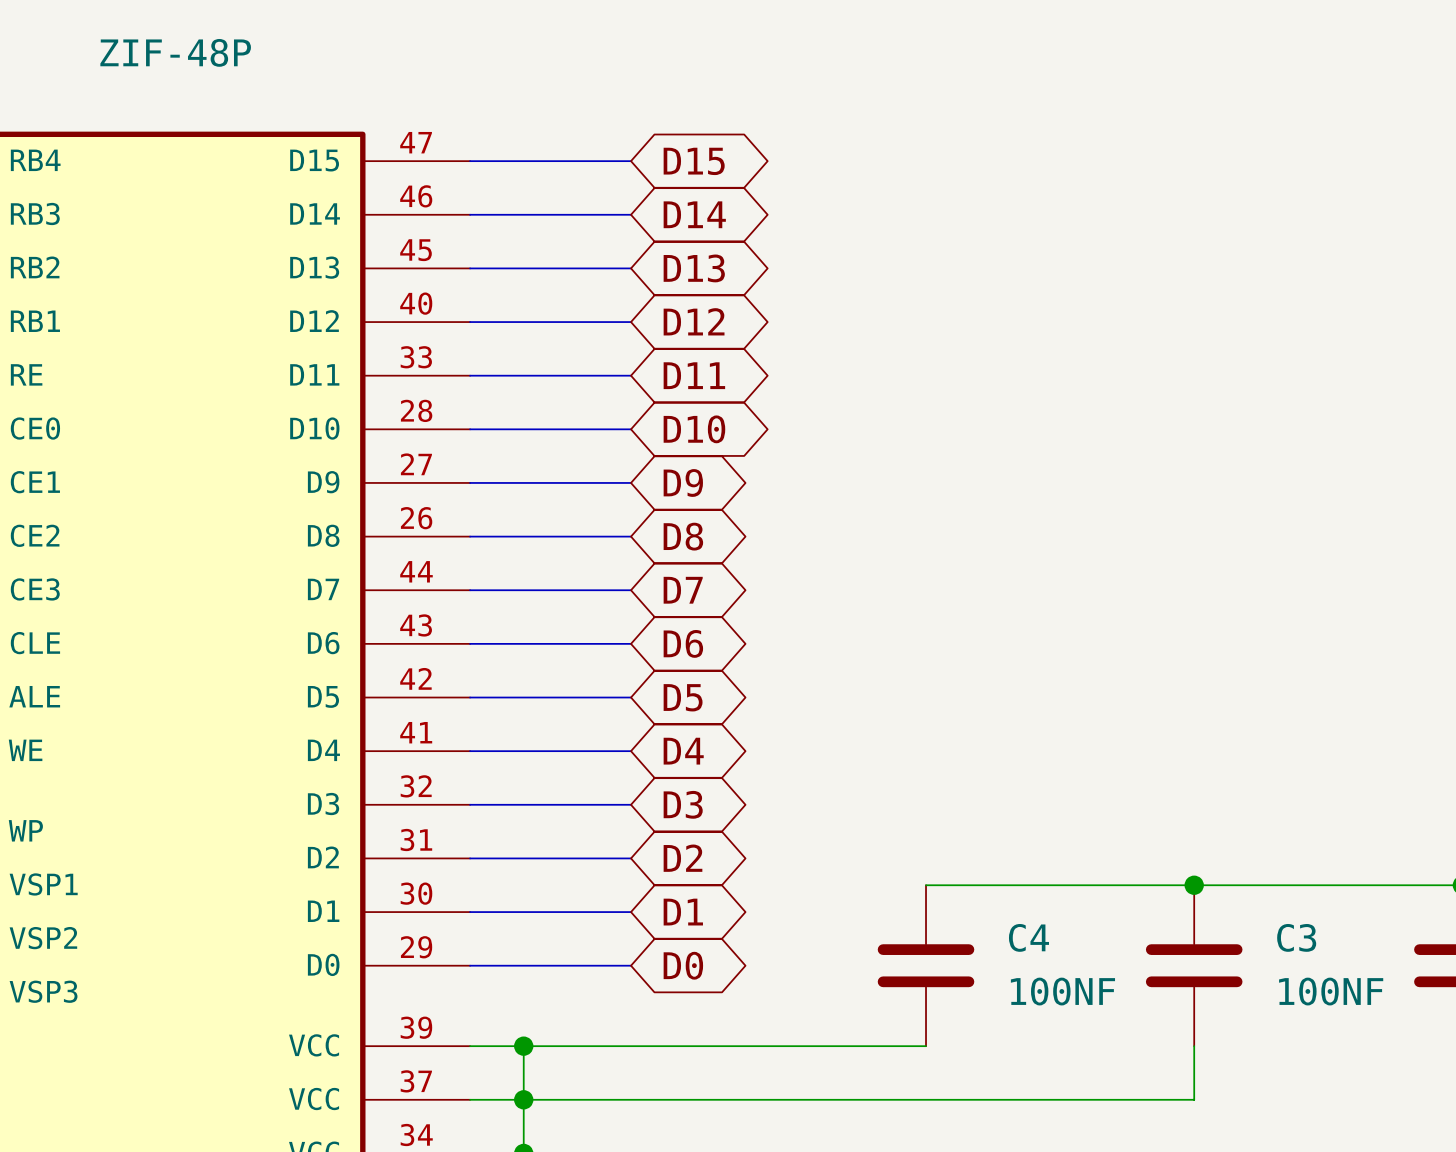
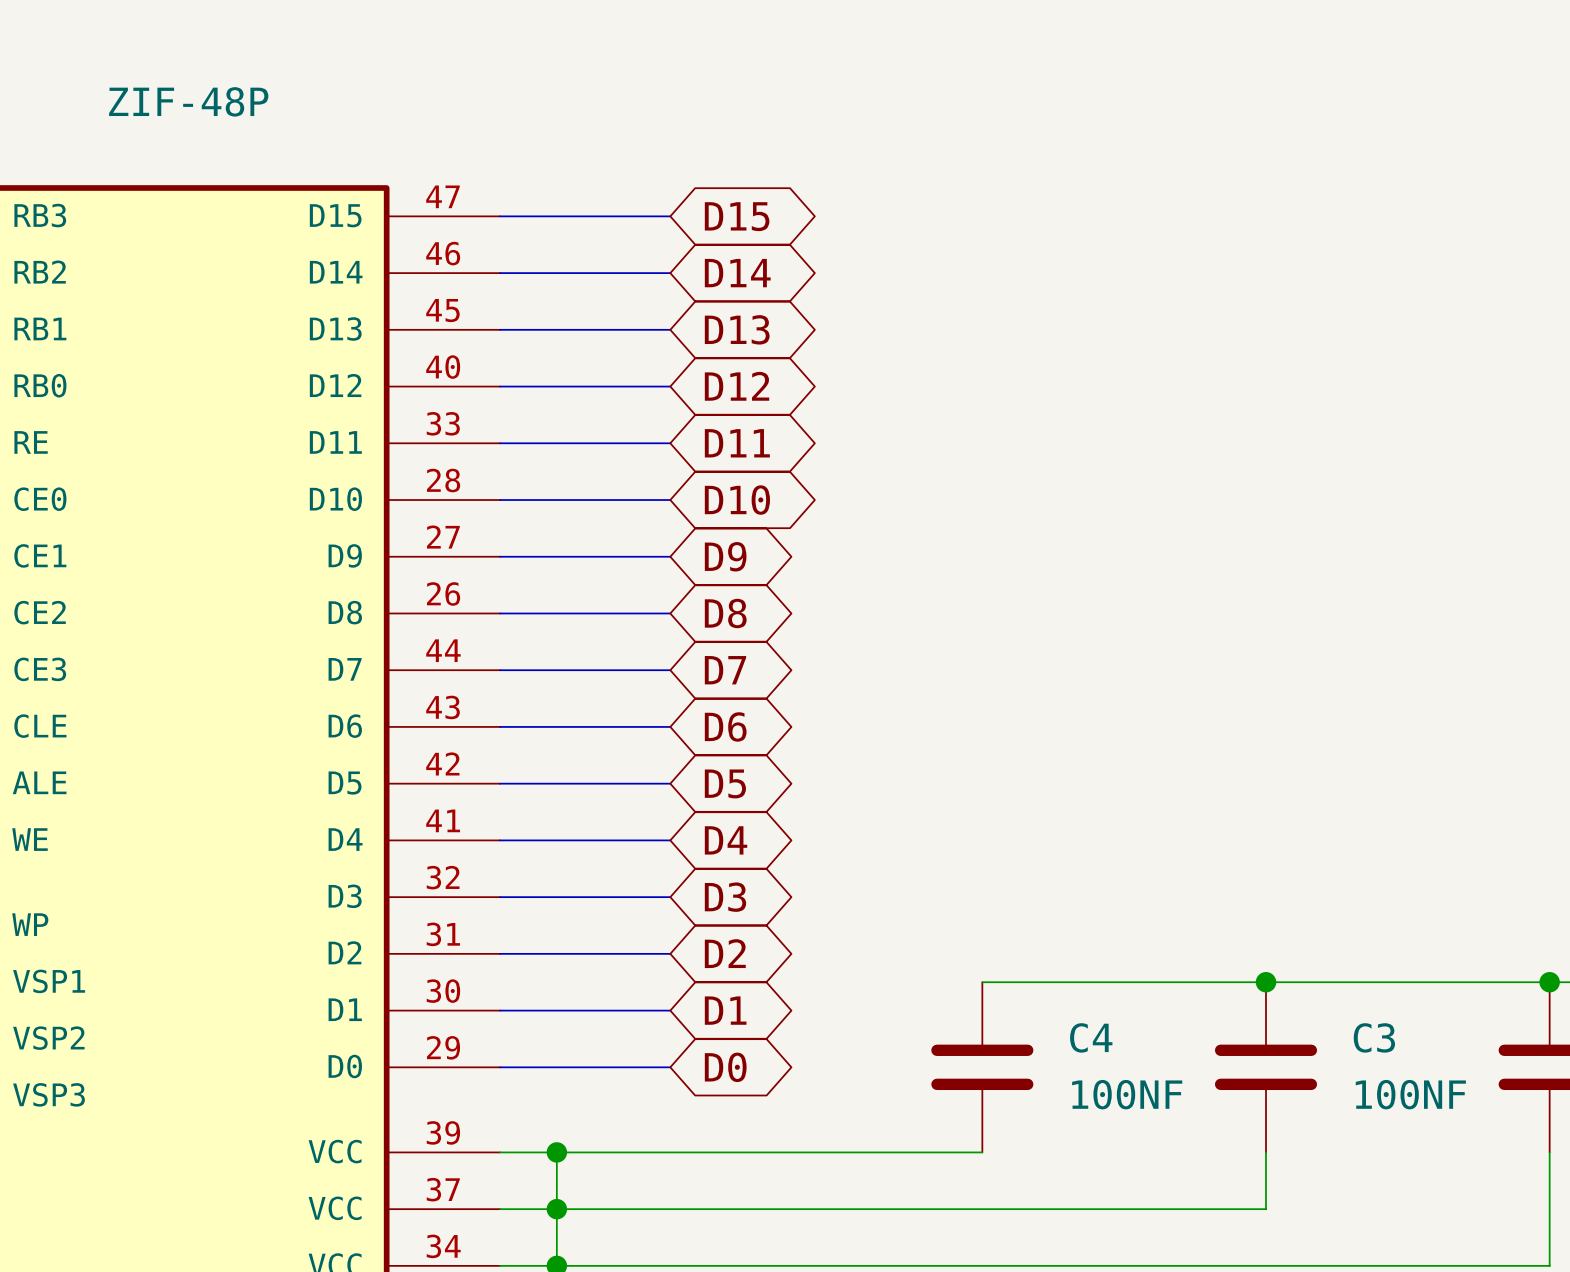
ZIF-48P pin name: RB4 (35, 160) -> RB3 (40, 215)
ZIF-48P pin name: RB3 (35, 213) -> RB2 (40, 272)
ZIF-48P pin name: RB2 (35, 267) -> RB1 (40, 328)
ZIF-48P pin name: RB1 (35, 321) -> RB0 (40, 385)

